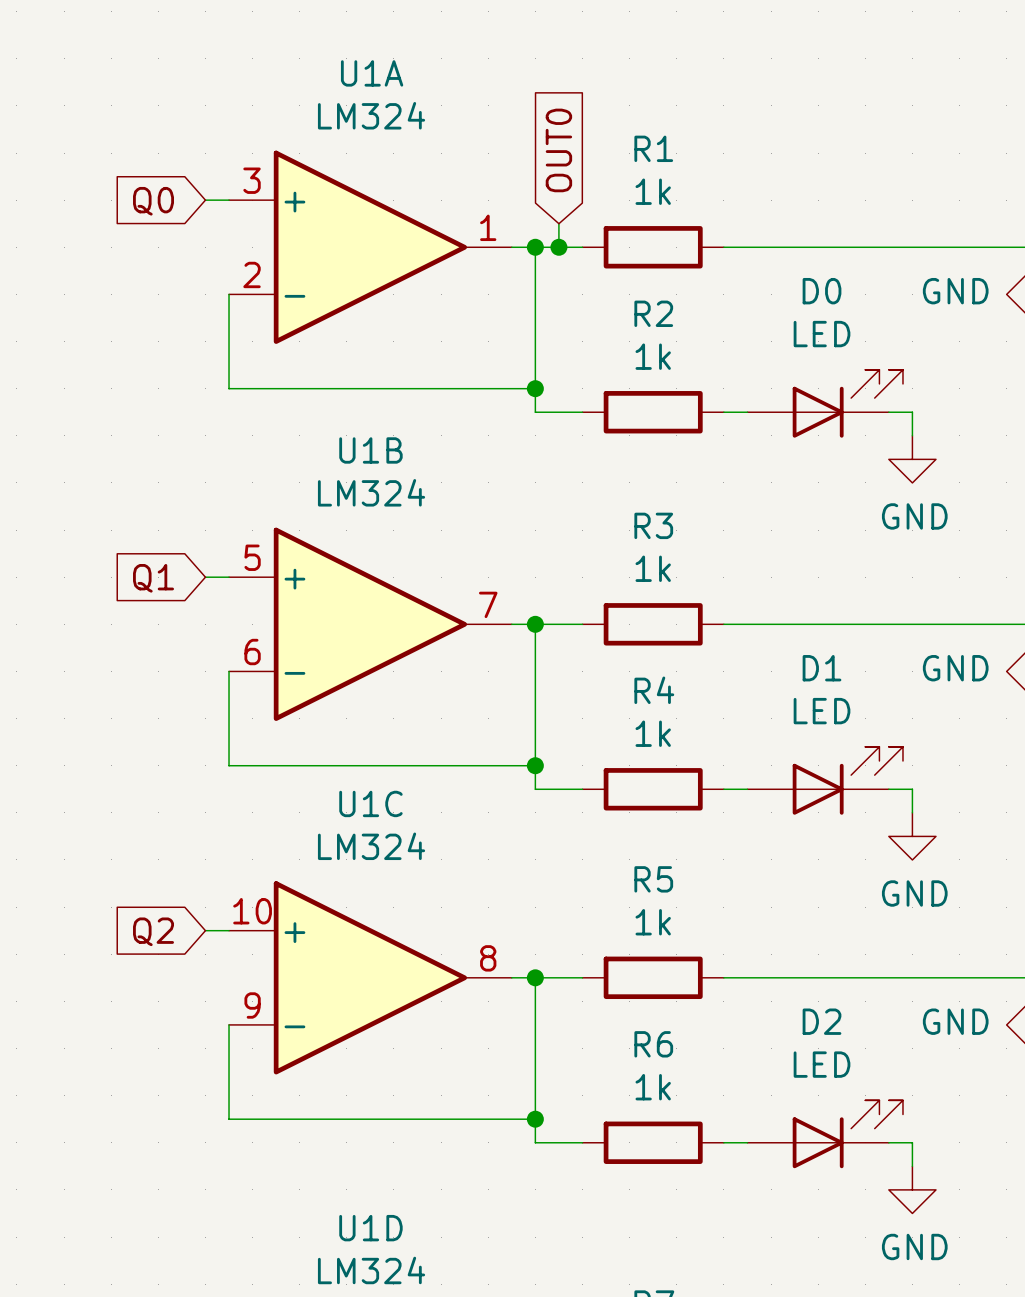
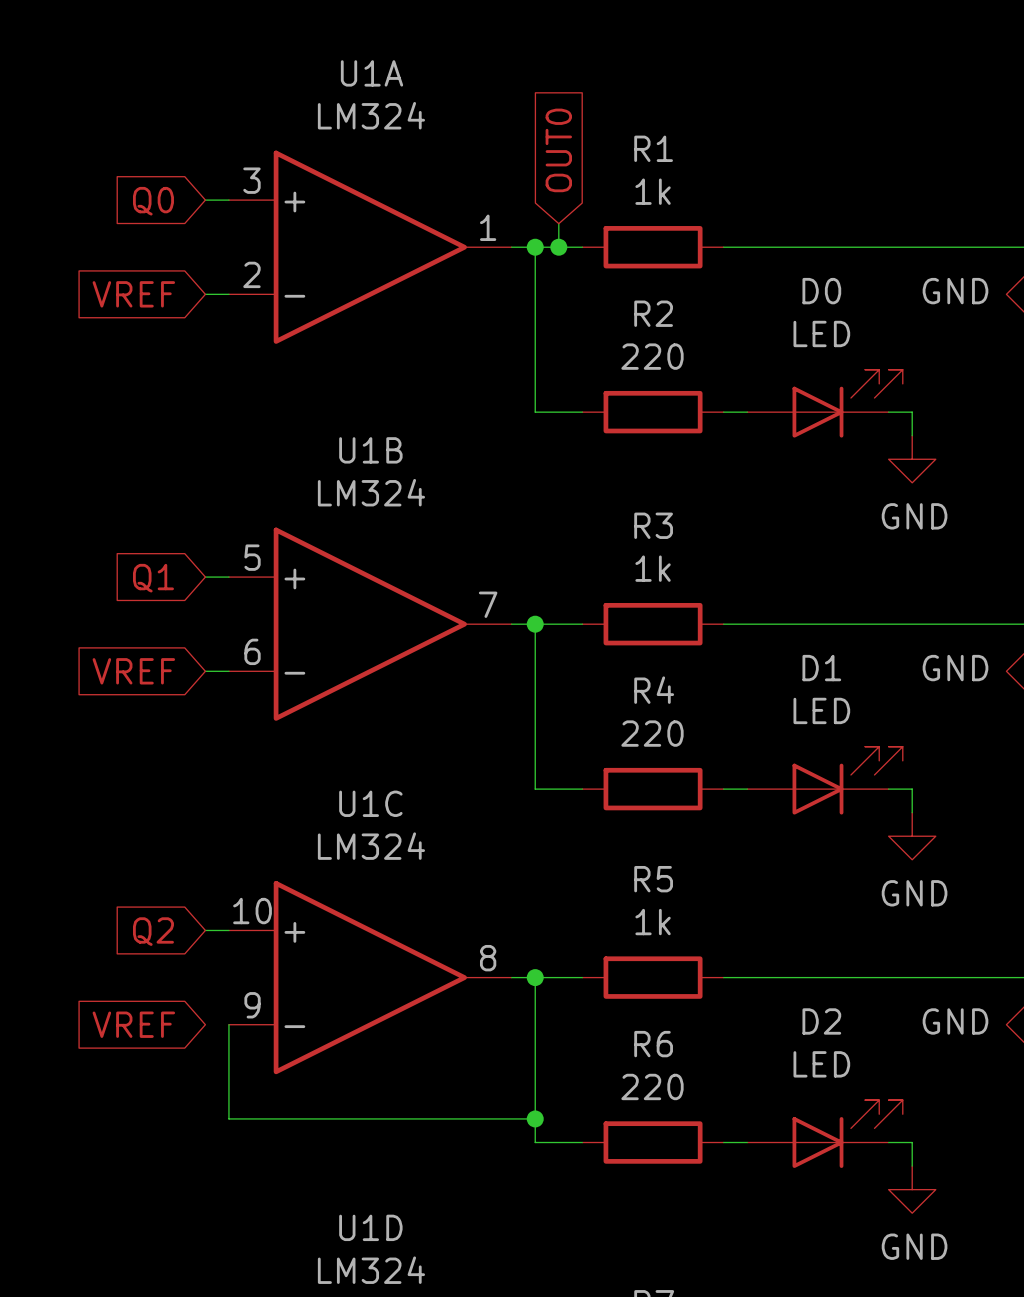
global label: none -> VREF (133, 294)
wire: (229, 294) (229, 388) (535, 388) -> (228, 294) (205, 294)
R2 value: 1k (653, 356) -> 220 (652, 356)
junction: (535, 388) -> none
global label: none -> VREF (133, 671)
wire: (229, 671) (229, 765) (535, 765) -> (228, 671) (205, 671)
R4 value: 1k (653, 733) -> 220 (652, 733)
junction: (535, 765) -> none
global label: none -> VREF (133, 1024)
R6 value: 1k (653, 1087) -> 220 (652, 1086)

